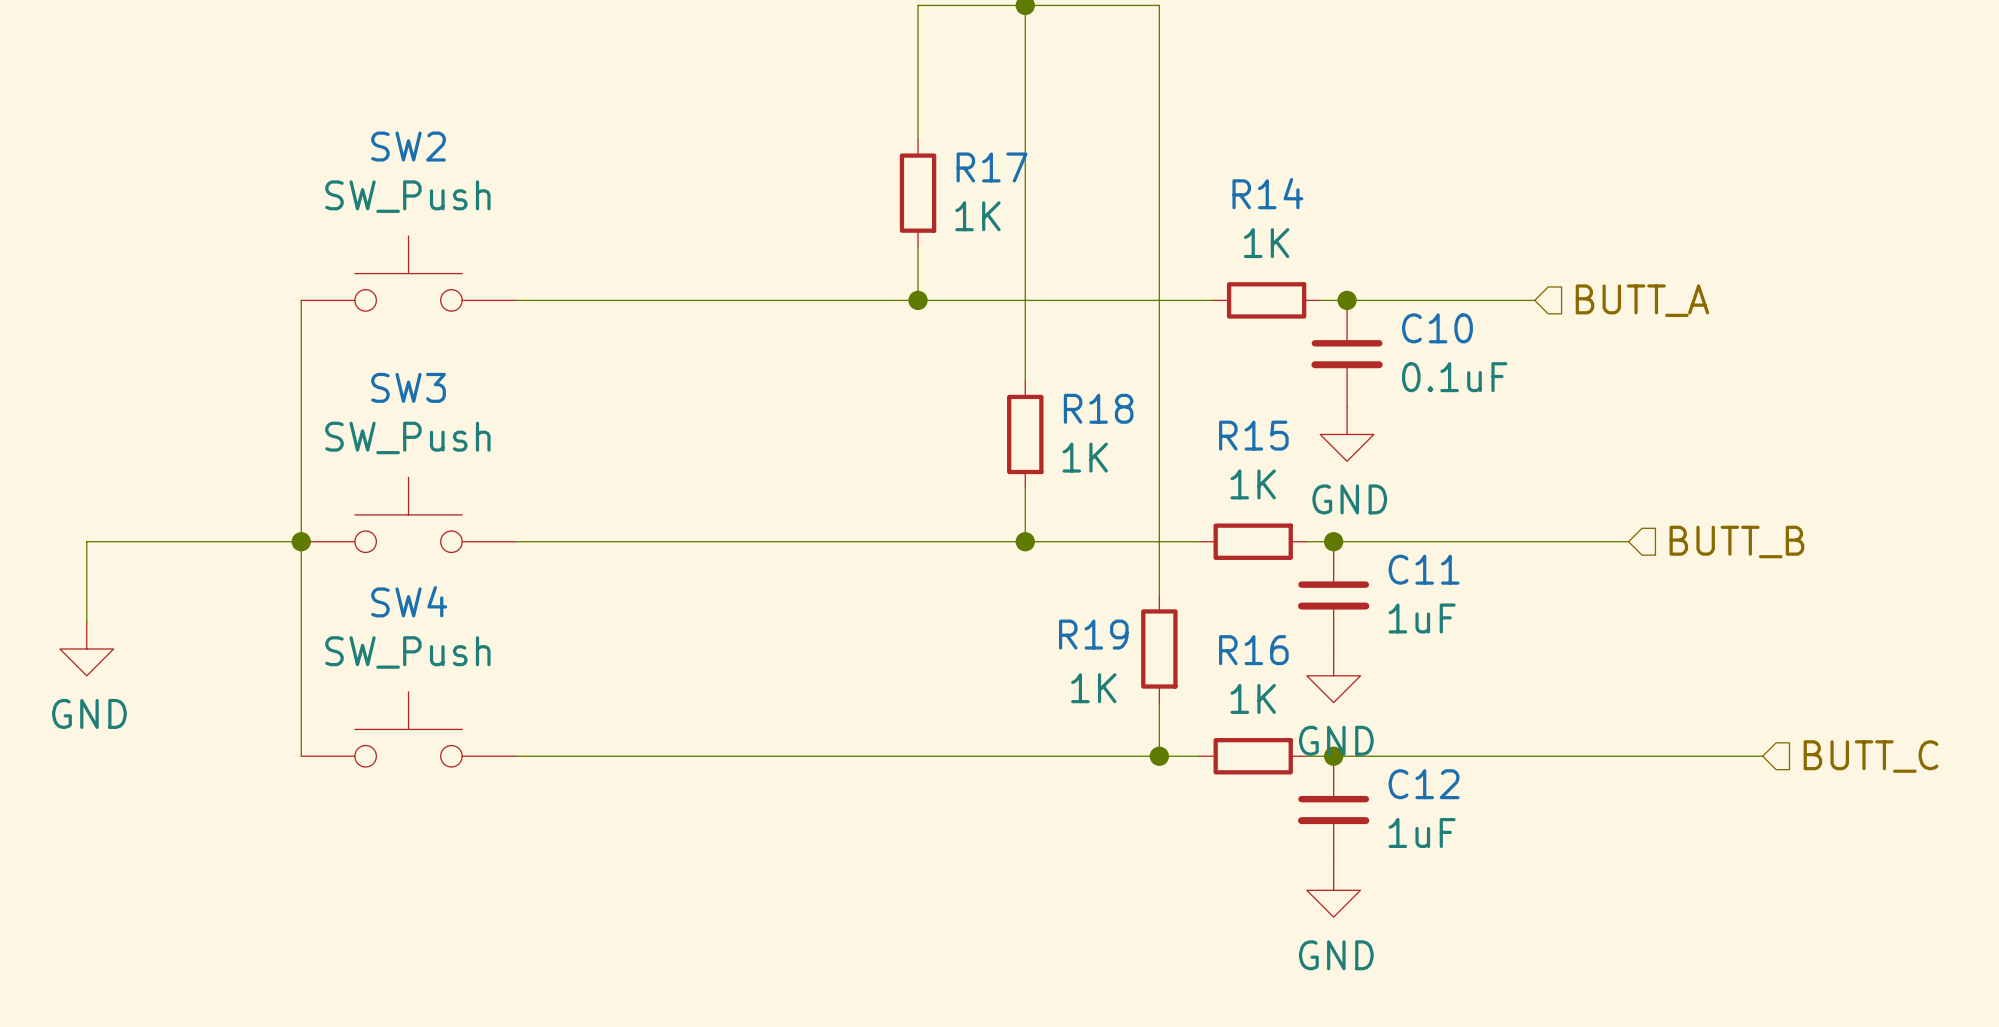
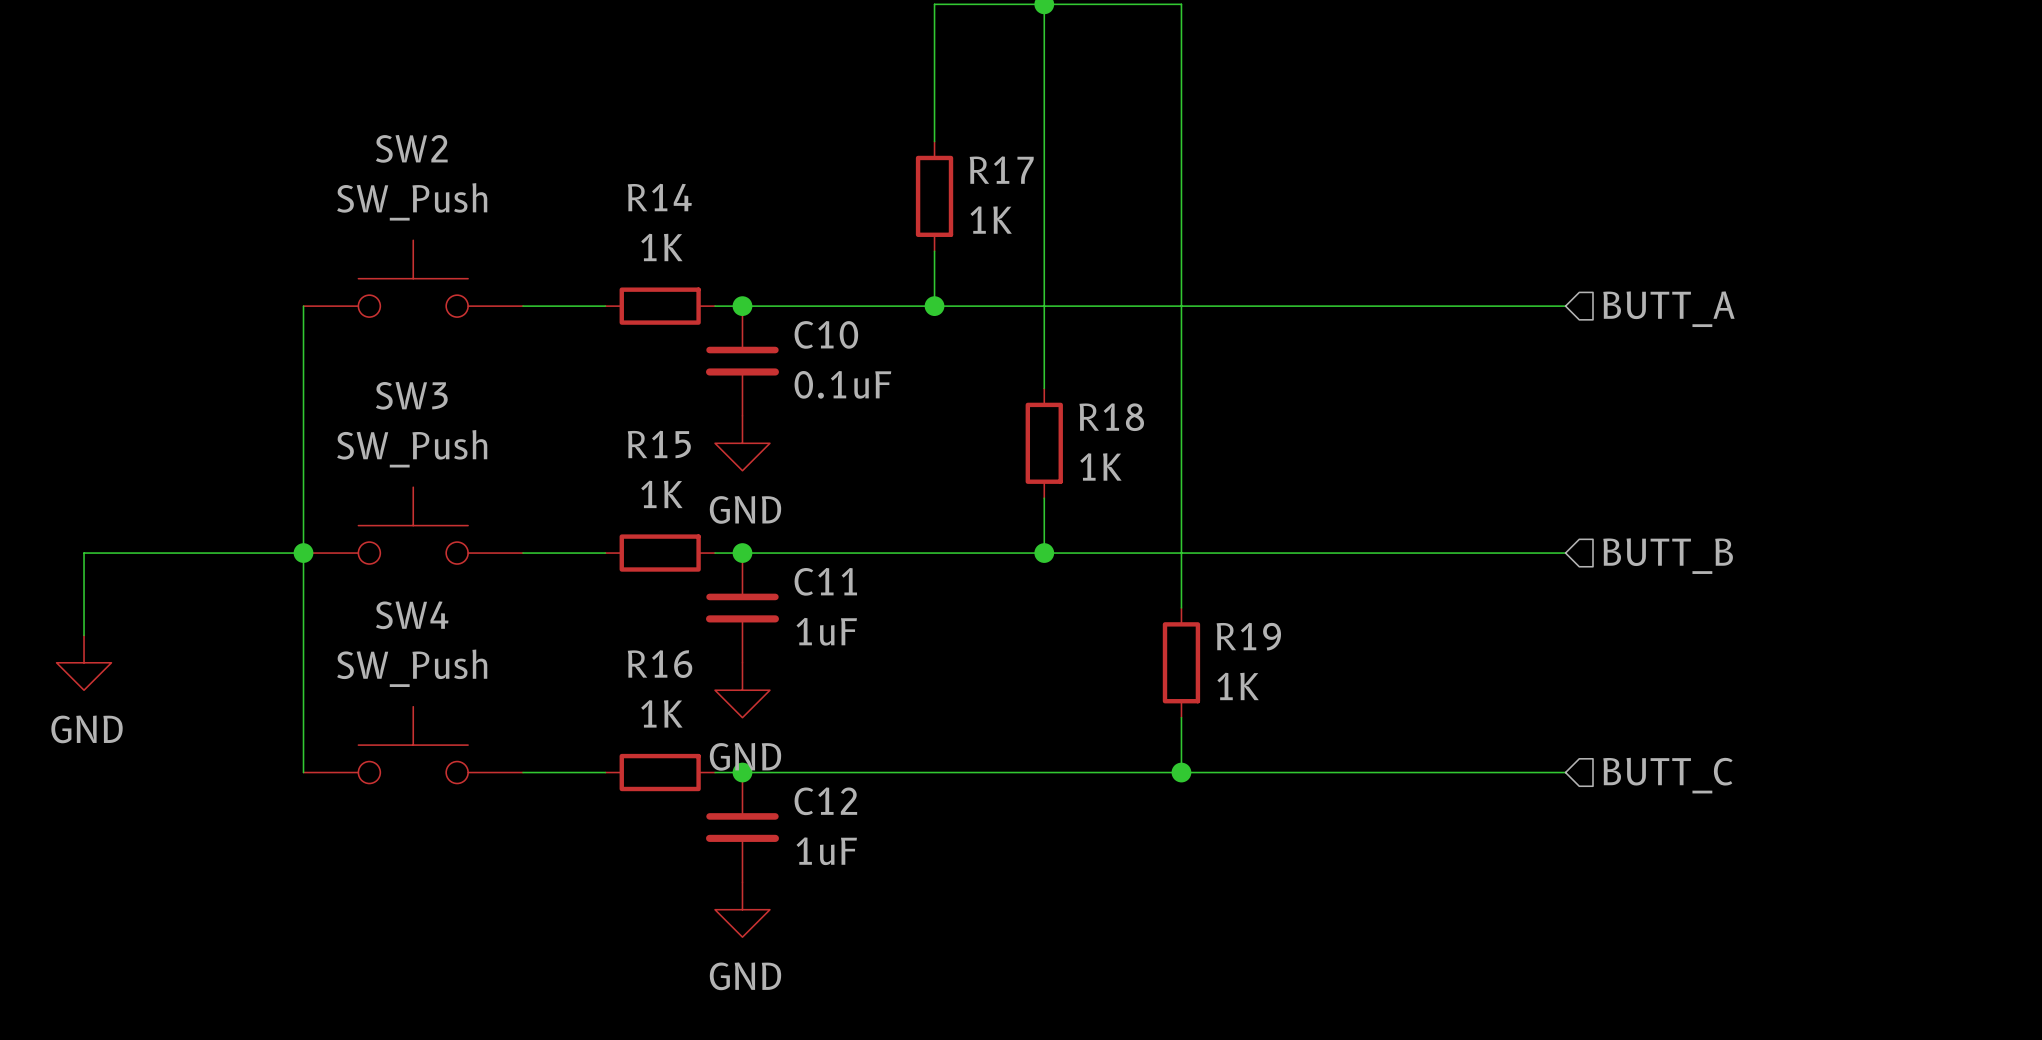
wire: (596, 300) (703, 300) -> none
junction: none -> (742, 306)
wire: none -> (1236, 306) (1346, 306)
R14 position: (1266, 300) -> (660, 306)
junction: (1347, 300) -> none
C10 position: (1347, 354) -> (742, 360)
power symbol: none -> GND (742, 443)
power symbol: GND (1347, 434) -> none
wire: (596, 541) (703, 541) -> none
junction: none -> (742, 553)
wire: none -> (1222, 553) (1332, 553)
R15 position: (1253, 541) -> (660, 553)
junction: (1333, 541) -> none
wire: (1534, 541) (1628, 541) -> none
hierarchical label position: BUTT_B (1736, 542) -> BUTT_B (1668, 556)
C11 position: (1333, 595) -> (742, 607)
R19 name position: R19 (1093, 634) -> R19 (1248, 636)
power symbol: none -> GND (742, 690)
power symbol: GND (1333, 675) -> none
R19 value position: 1K (1093, 688) -> 1K (1238, 686)
wire: (596, 756) (703, 756) -> none
junction: none -> (742, 772)
wire: none -> (1222, 772) (1332, 772)
R16 position: (1253, 756) -> (660, 772)
junction: (1333, 756) -> none
wire: (1534, 756) (1762, 756) -> none
hierarchical label position: BUTT_C (1871, 756) -> BUTT_C (1667, 775)
C12 position: (1333, 809) -> (742, 827)
power symbol: none -> GND (742, 909)
power symbol: GND (1333, 890) -> none

